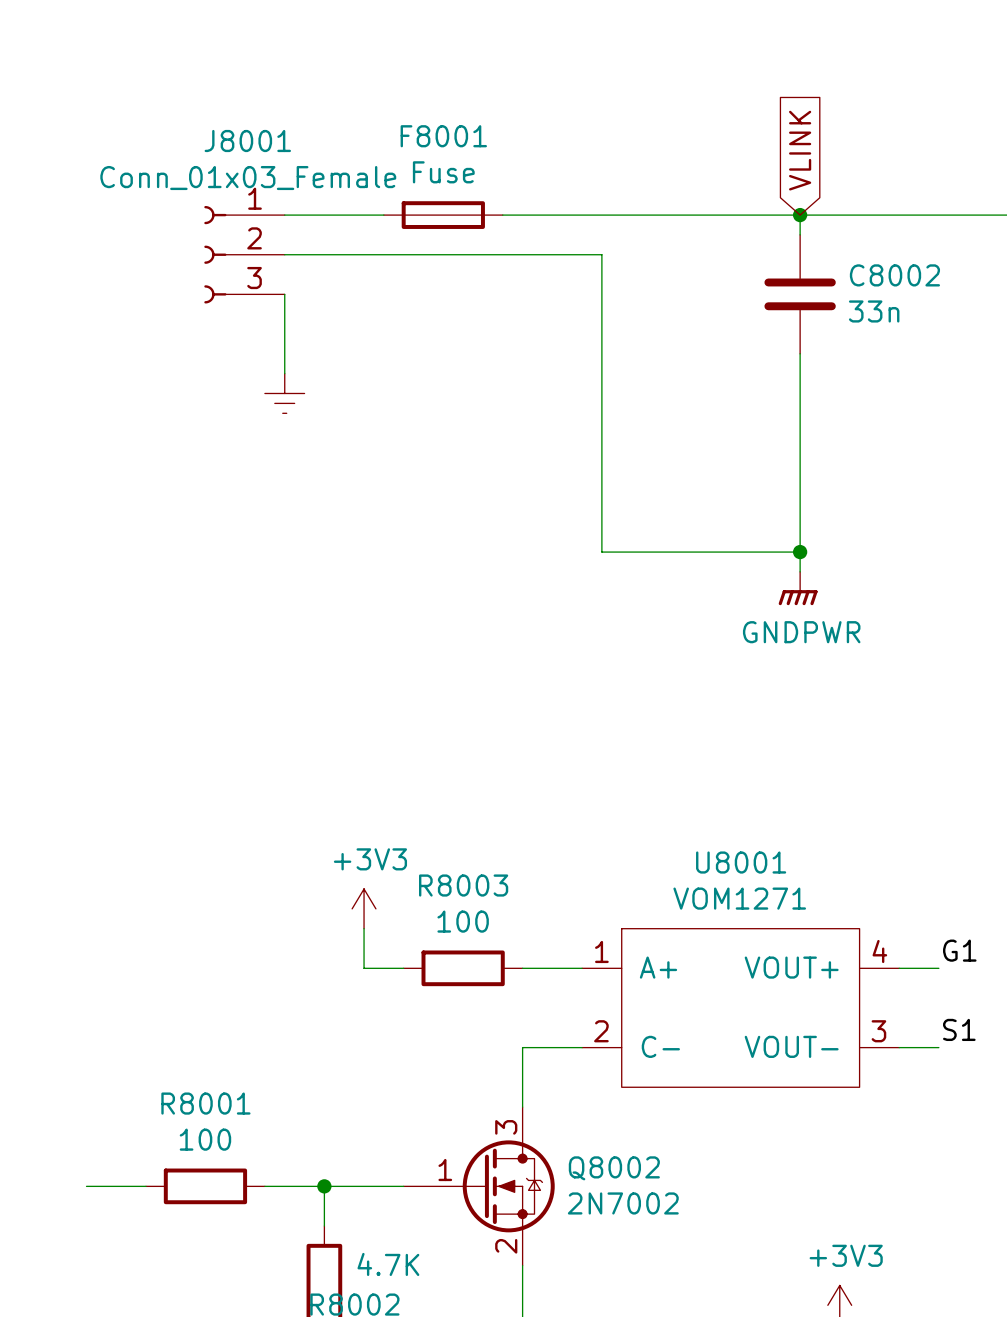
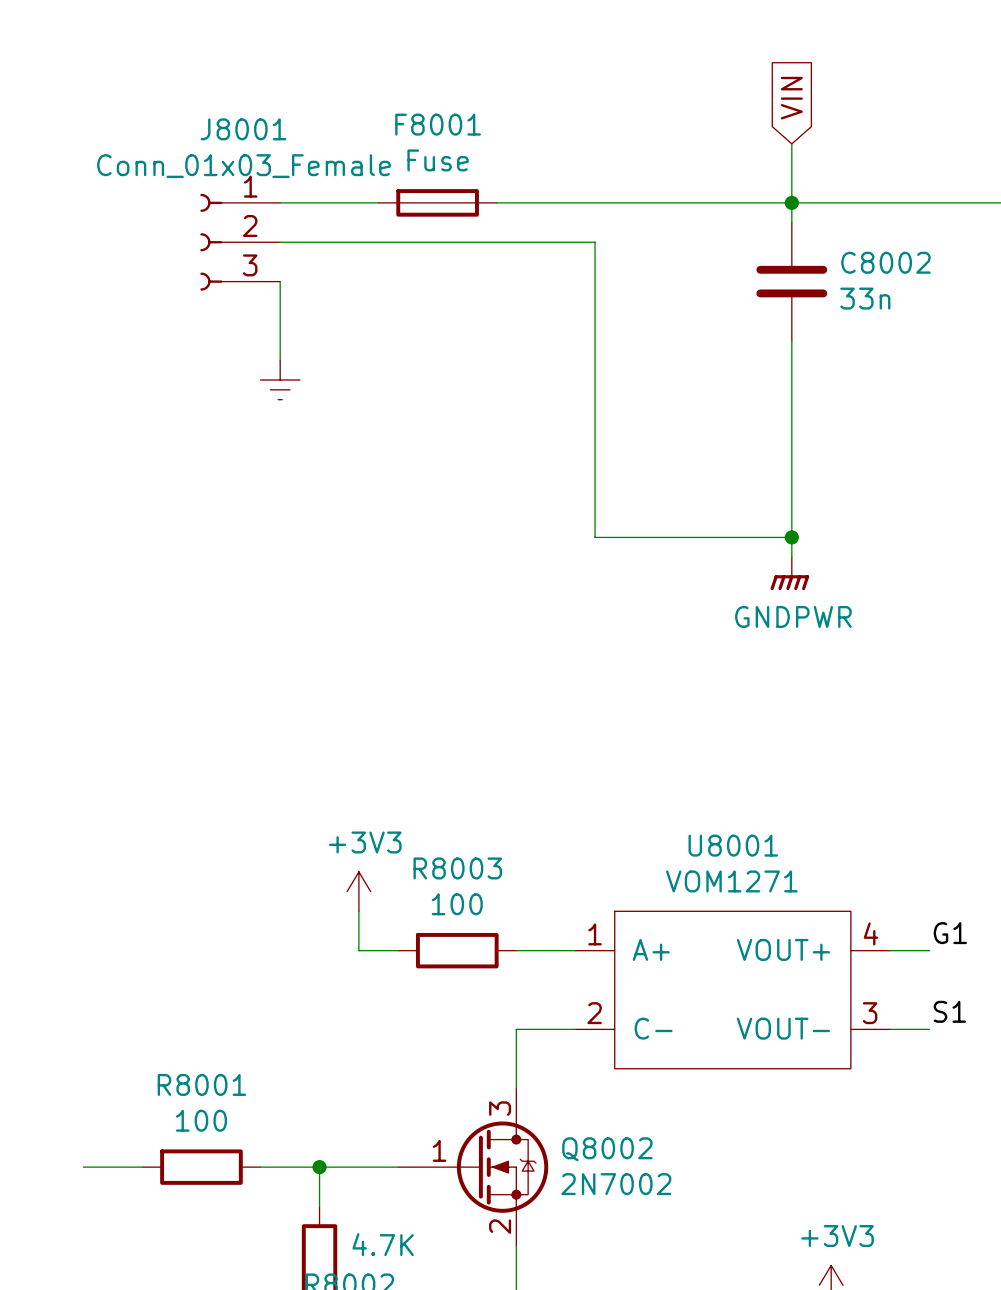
global label: VLINK (800, 150) -> VIN (791, 98)
wire: none -> (791, 143) (791, 202)

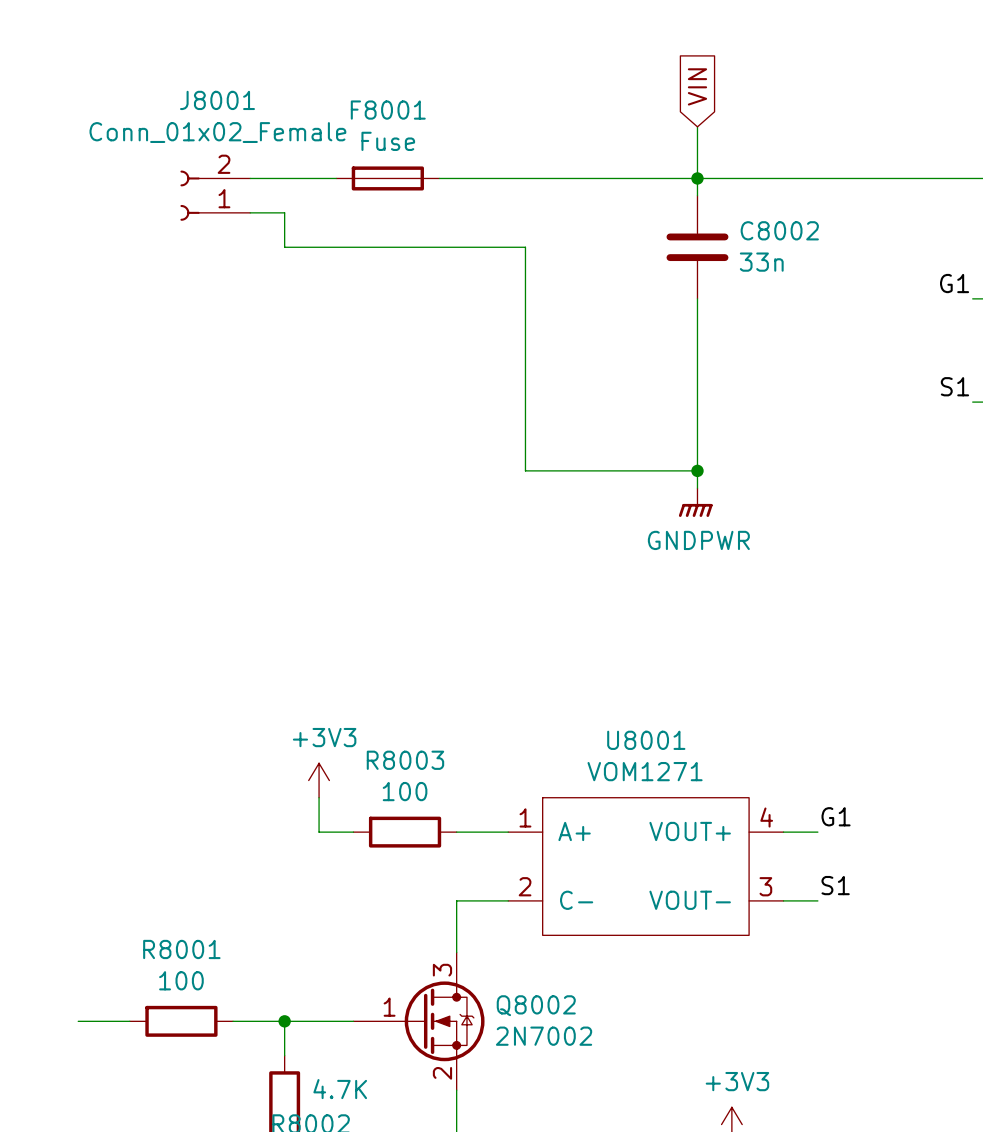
J8001 value: Conn_01x03_Female (243, 166) -> Conn_01x02_Female (217, 132)
J8001 symbol: [200, 193, 281, 291] -> [180, 170, 251, 221]
wire: (319, 242) (595, 242) (595, 281) -> (284, 212) (284, 247) (525, 247)
wire: (280, 281) (280, 360) -> none
power symbol: (280, 379) -> none

